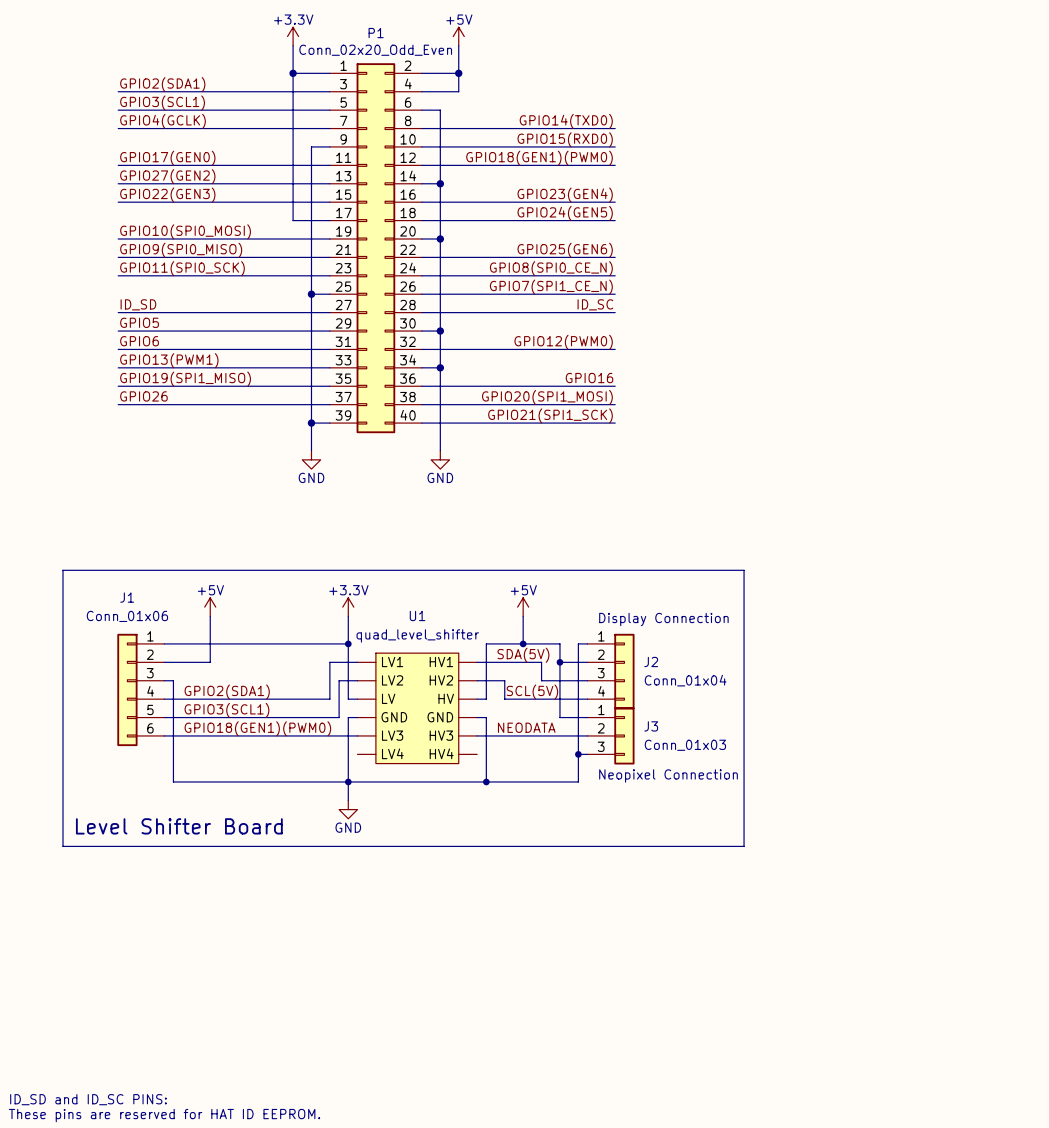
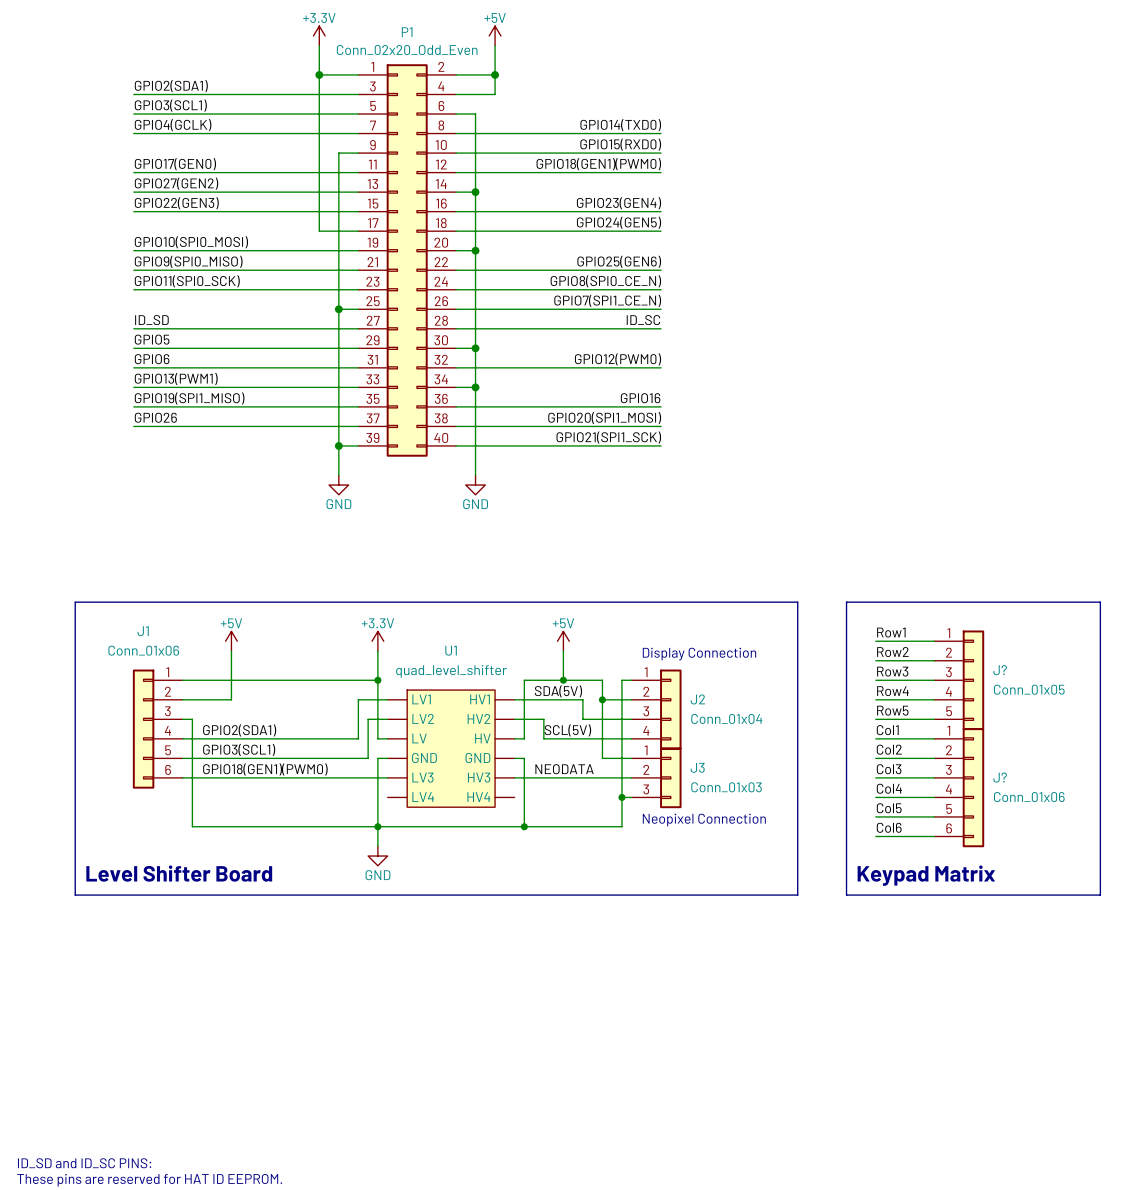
line: none -> (846, 602) (1100, 602) (1100, 895) (846, 895) (846, 602)
label: none -> Row1 (891, 632)
wire: none -> (875, 641) (934, 641)
label: none -> Row2 (892, 652)
wire: none -> (875, 660) (934, 660)
label: none -> Row3 (892, 671)
wire: none -> (875, 680) (934, 680)
J?: none -> Conn_01x05 (959, 680)
label: none -> Row4 (892, 691)
wire: none -> (875, 699) (934, 699)
label: none -> Row5 (892, 710)
wire: none -> (875, 719) (934, 719)
label: none -> Col1 (887, 730)
wire: none -> (875, 738) (934, 738)
label: none -> Col2 (889, 749)
wire: none -> (875, 758) (934, 758)
label: none -> Col3 (889, 769)
wire: none -> (875, 777) (934, 777)
label: none -> Col4 (889, 788)
J?: none -> Conn_01x06 (959, 787)
wire: none -> (875, 797) (934, 797)
label: none -> Col5 (889, 808)
wire: none -> (875, 816) (934, 816)
label: none -> Col6 (889, 827)
wire: none -> (875, 836) (934, 836)
text: none -> Keypad Matrix (926, 875)

